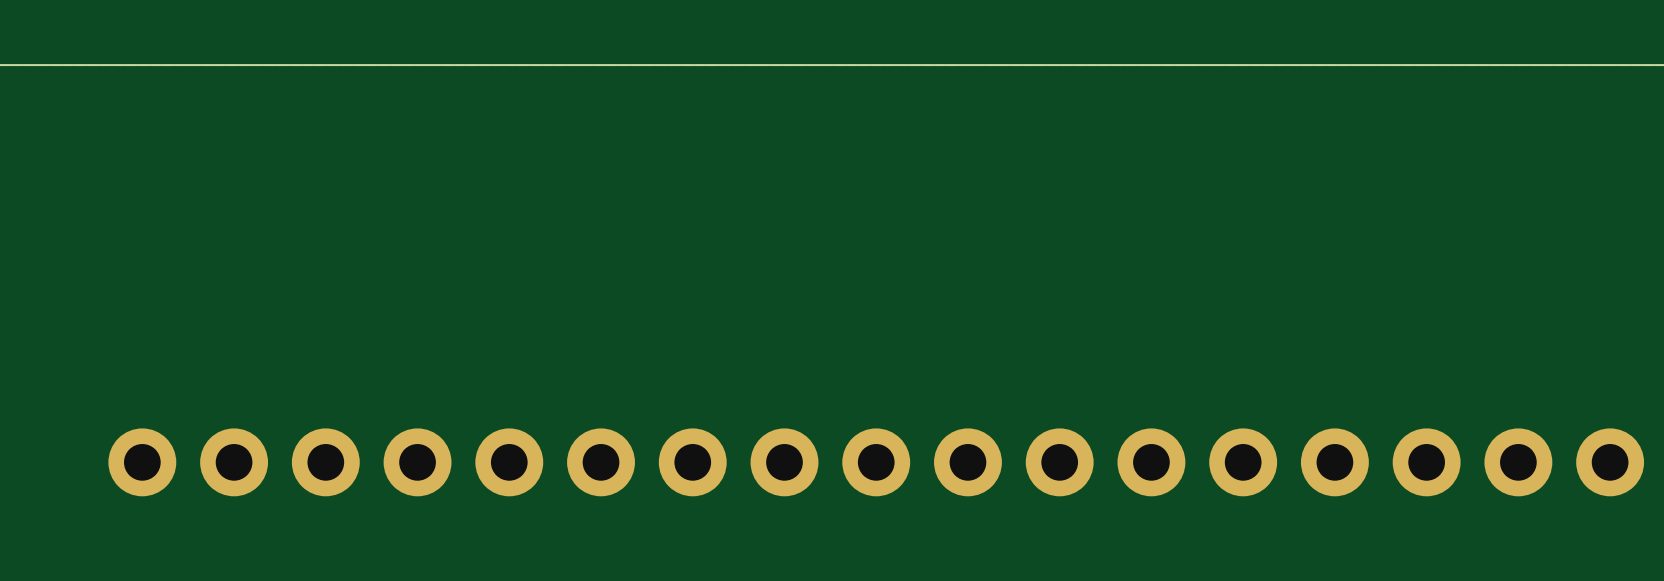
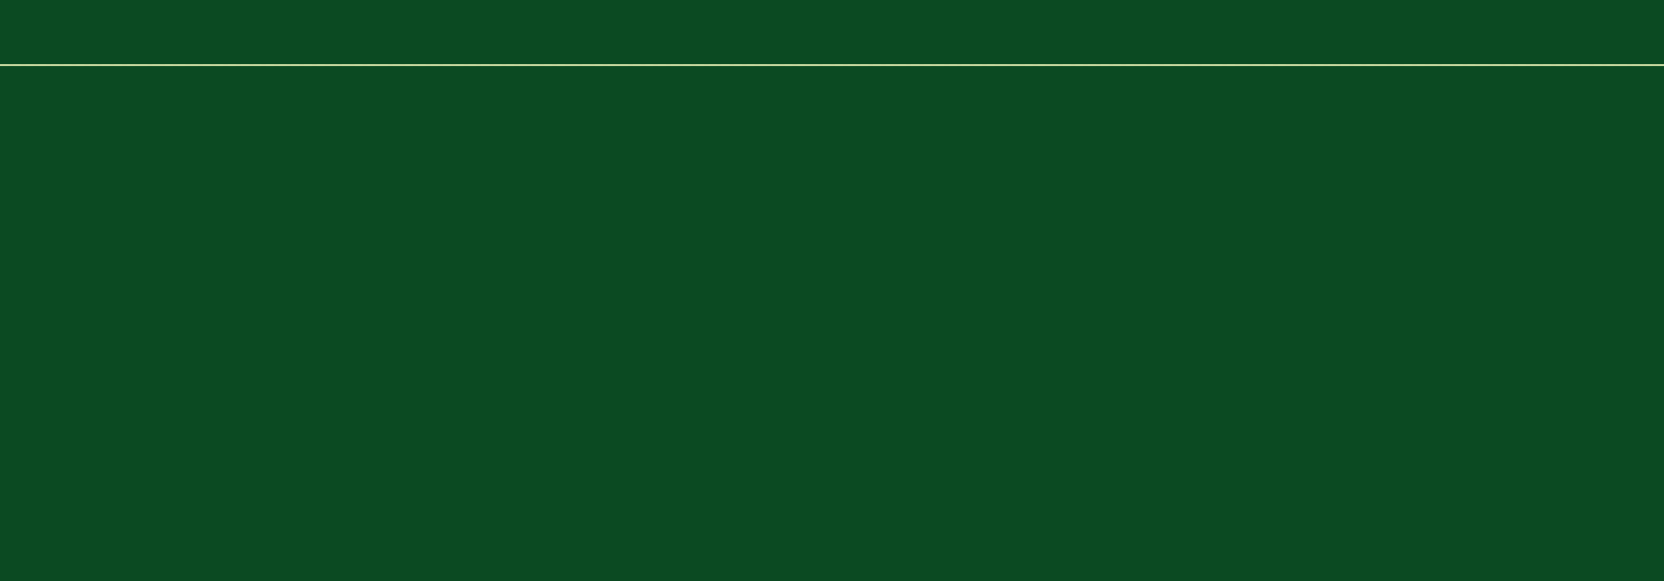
part: (876, 462) -> none

